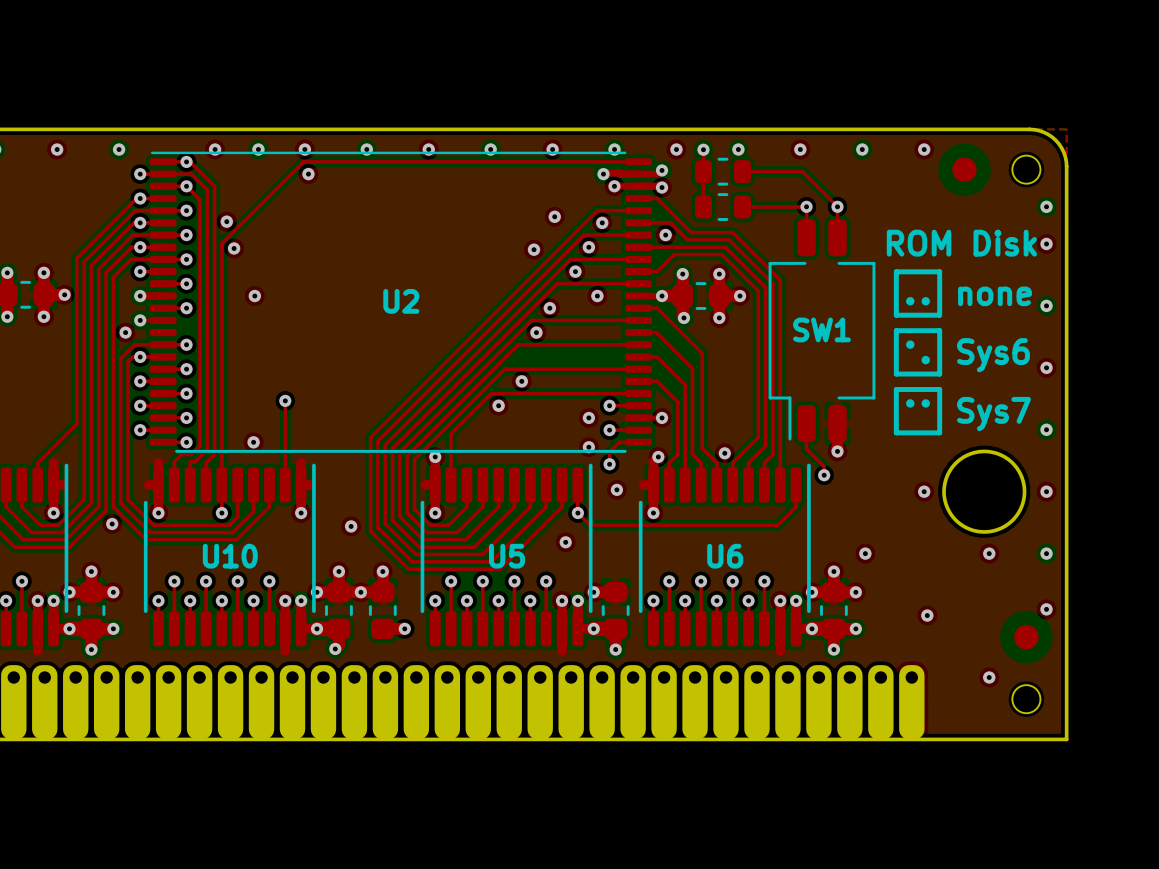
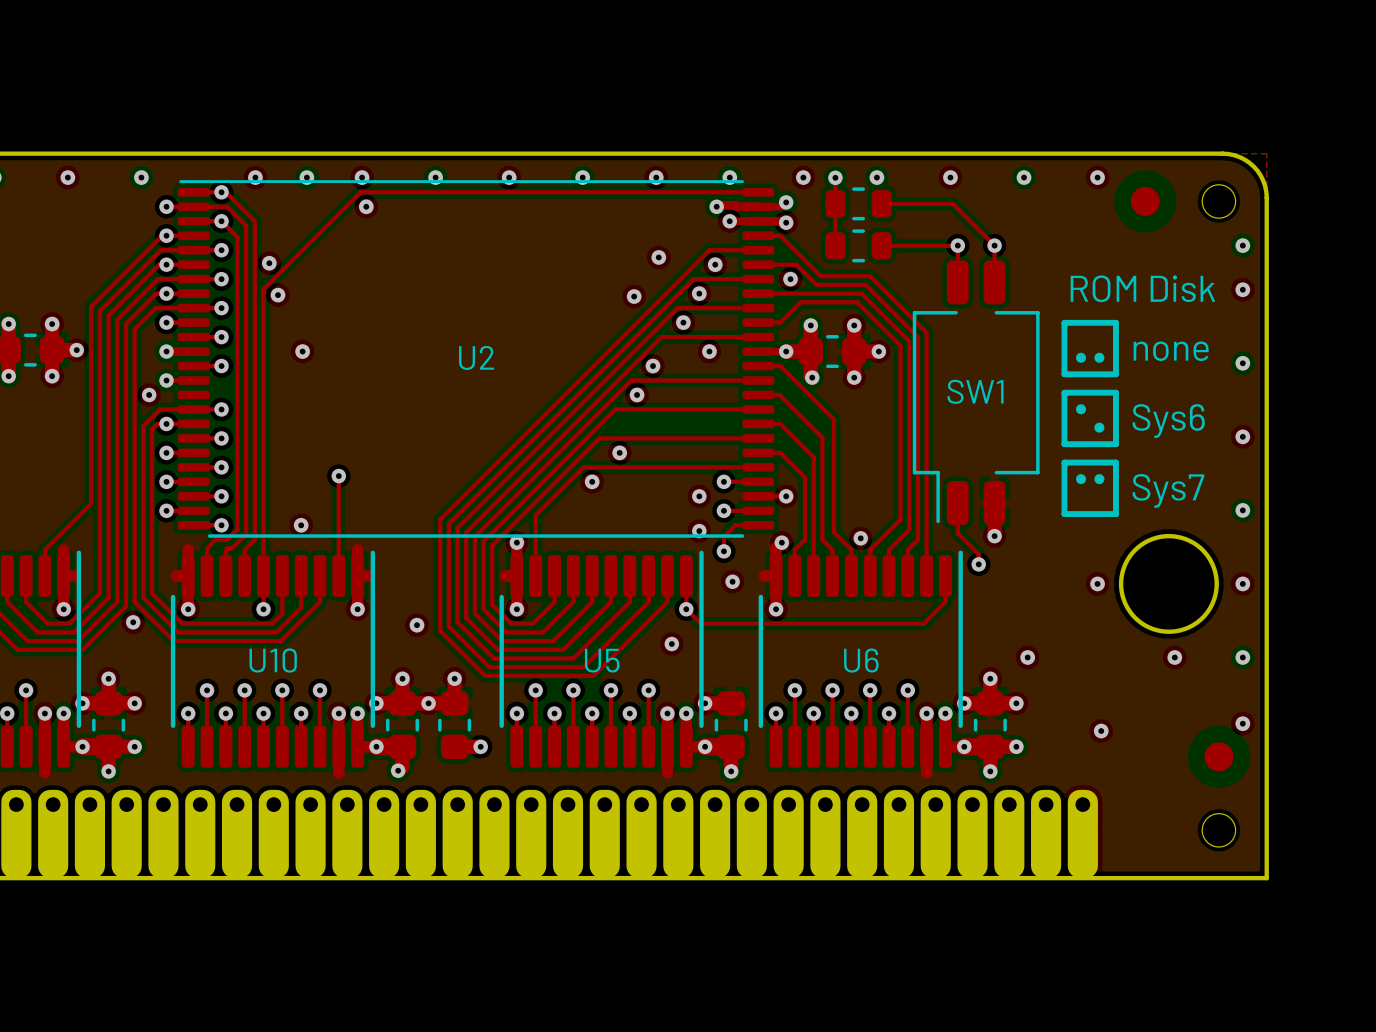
via: (989, 677) -> none

